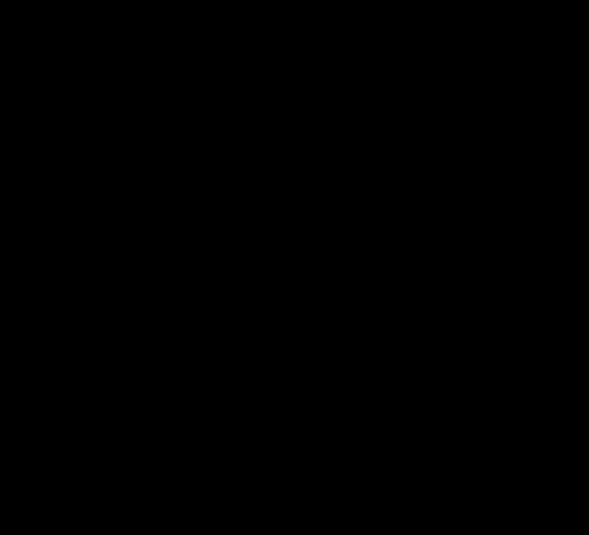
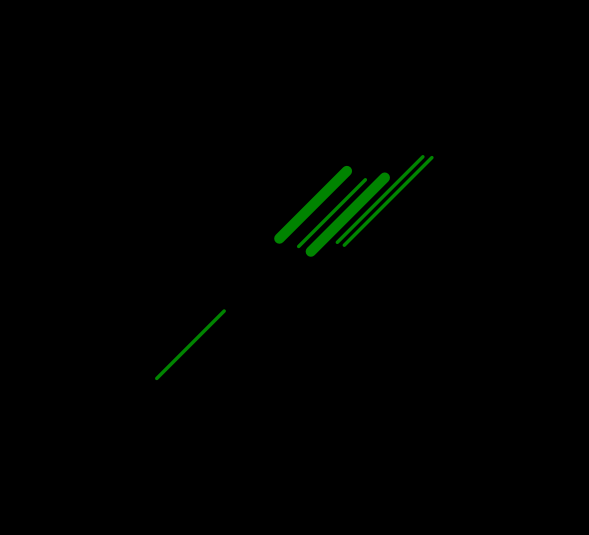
bottom track: none -> (422, 156) (337, 242)
bottom track: none -> (431, 157) (344, 245)
bottom track: none -> (346, 171) (279, 238)
bottom track: none -> (384, 177) (310, 251)
bottom track: none -> (365, 179) (298, 246)
bottom track: none -> (224, 311) (156, 378)

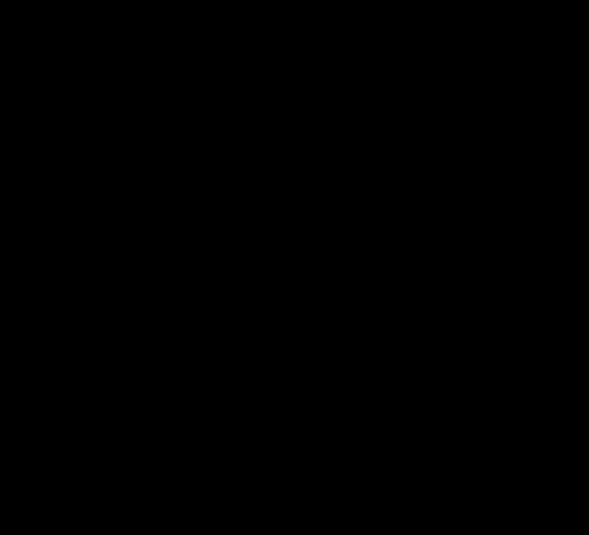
bottom track: (422, 156) (337, 242) -> none
bottom track: (431, 157) (344, 245) -> none
bottom track: (346, 171) (279, 238) -> none
bottom track: (384, 177) (310, 251) -> none
bottom track: (365, 179) (298, 246) -> none
bottom track: (224, 311) (156, 378) -> none

